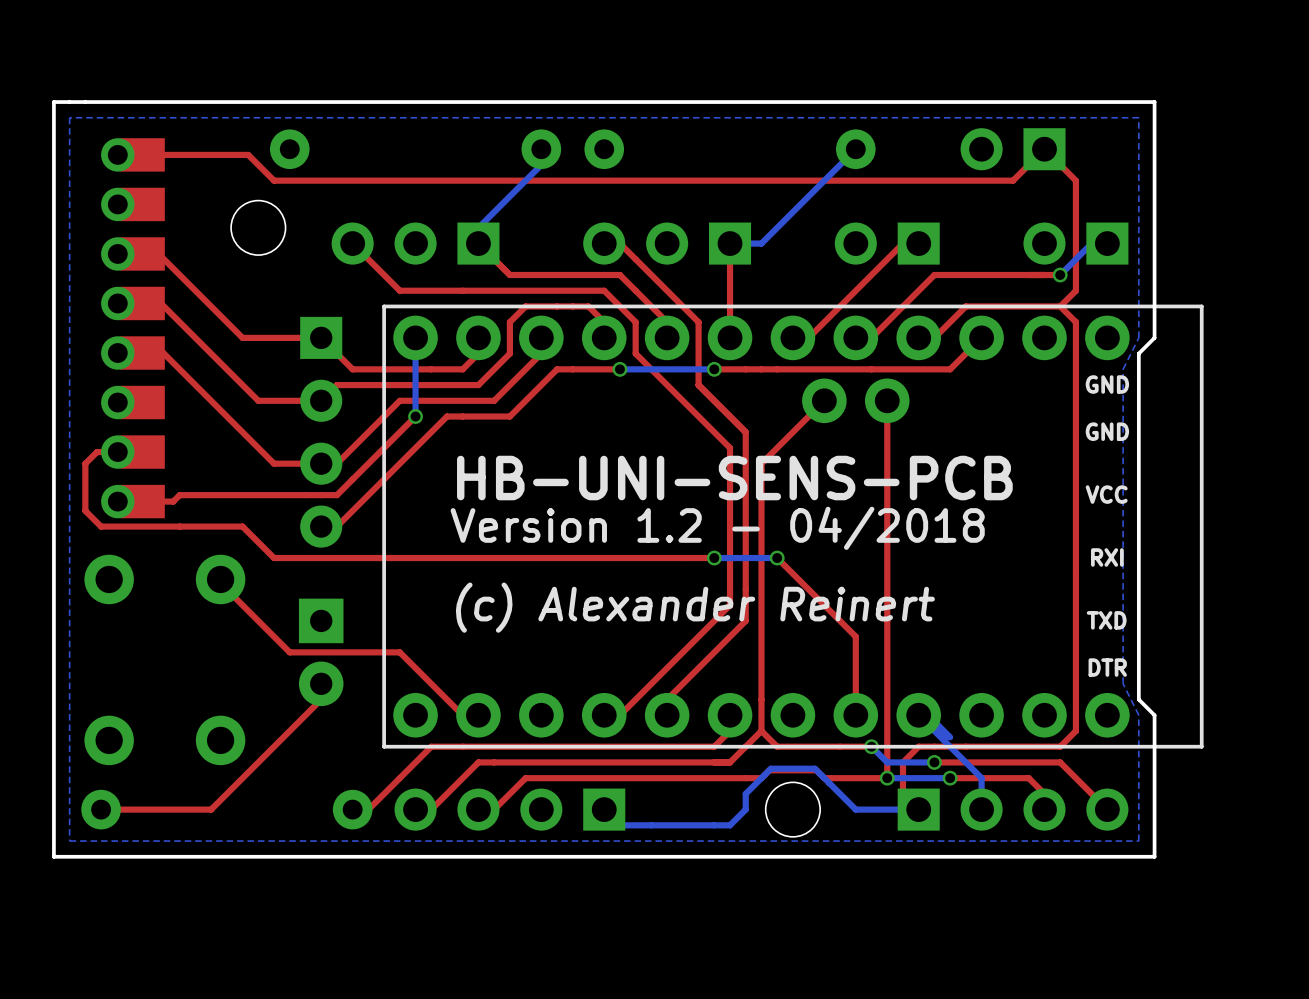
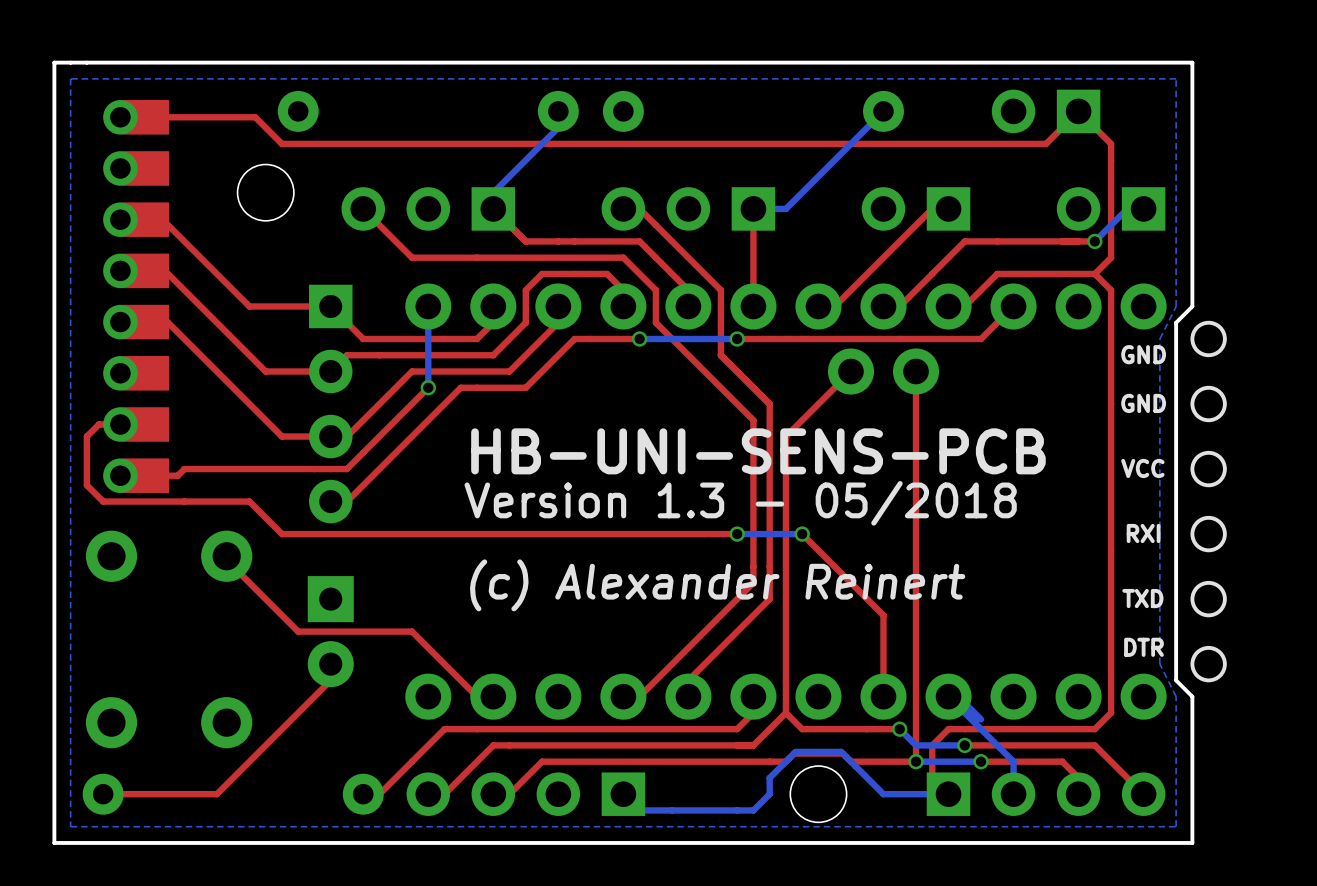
part footprint: [382, 304, 1204, 749] -> [405, 283, 1227, 720]
text: Version 1.2 - 04/2018 (717, 528) -> Version 1.3 - 05/2018 (740, 503)

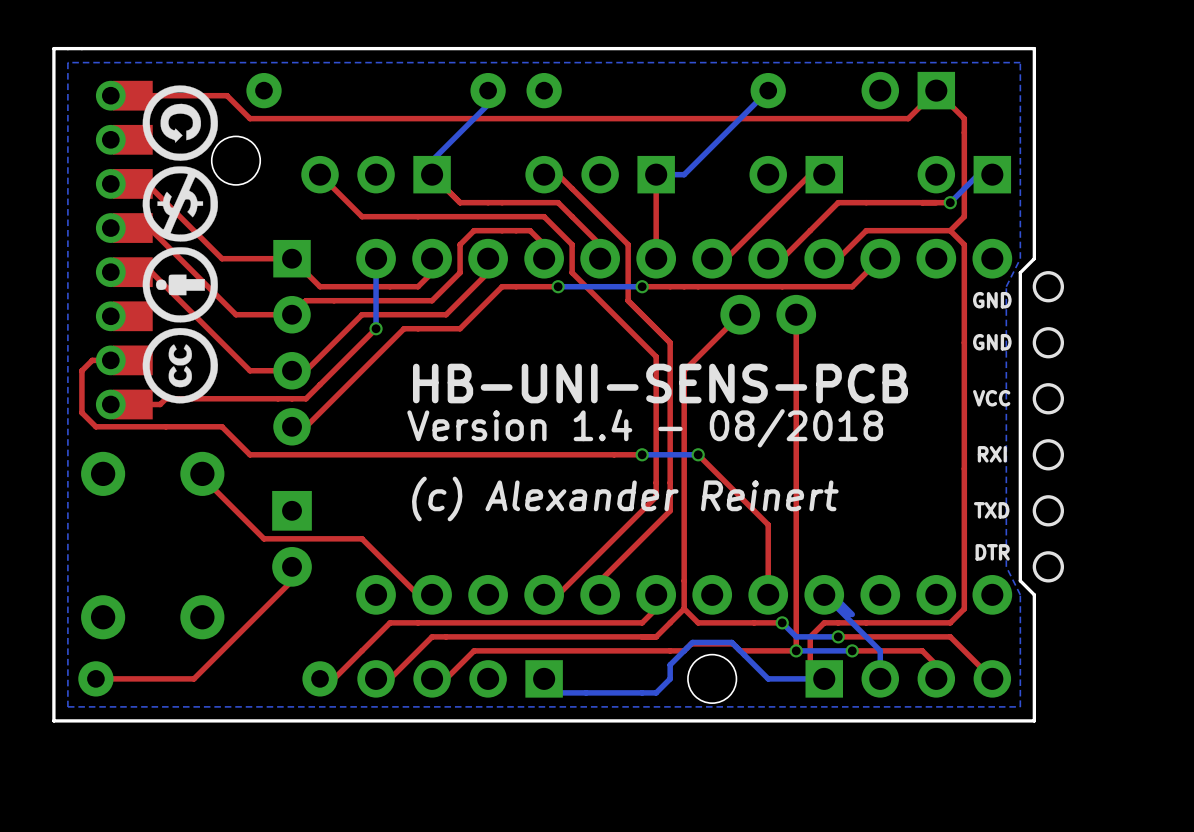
drawing: none -> [142, 85, 218, 404]
text: Version 1.3 - 05/2018 (740, 503) -> Version 1.4 - 08/2018 (645, 428)

